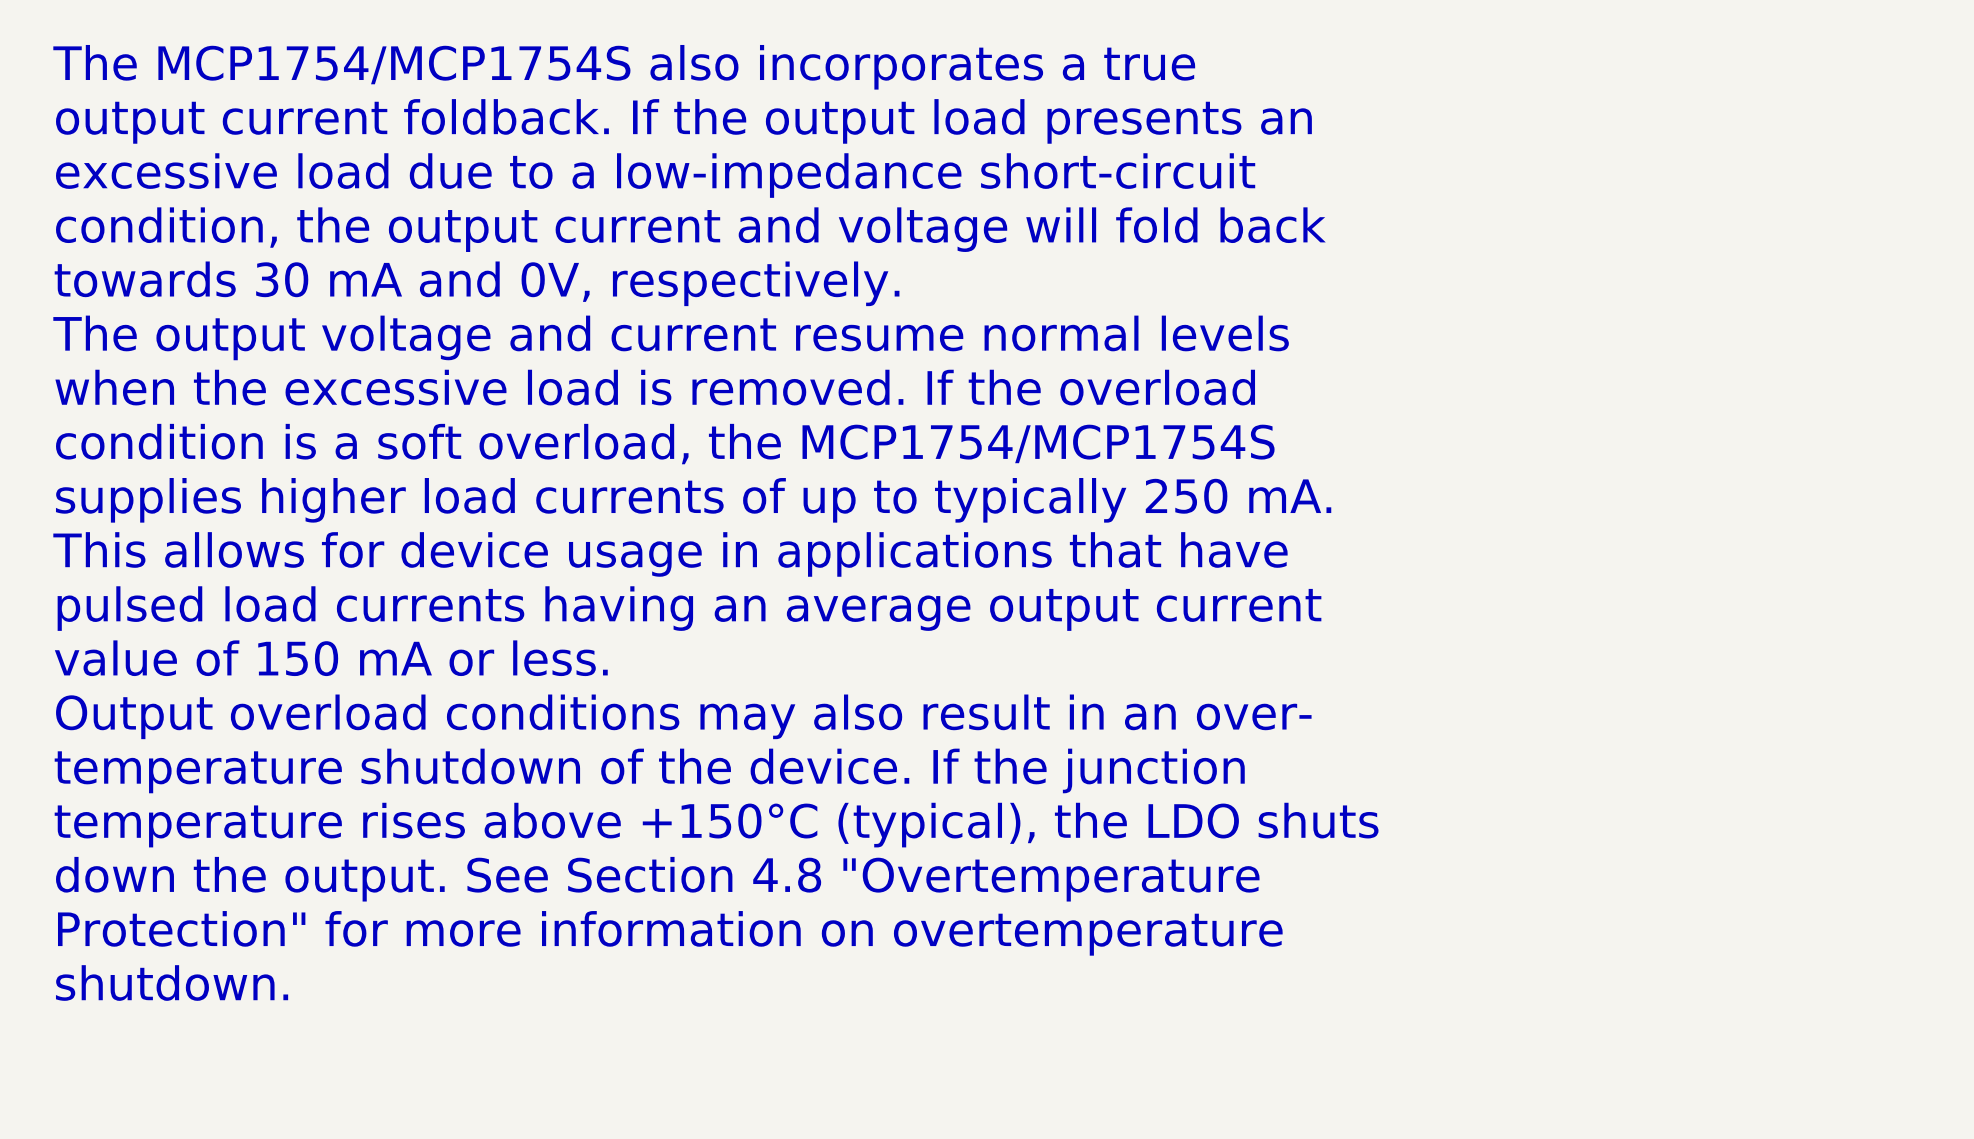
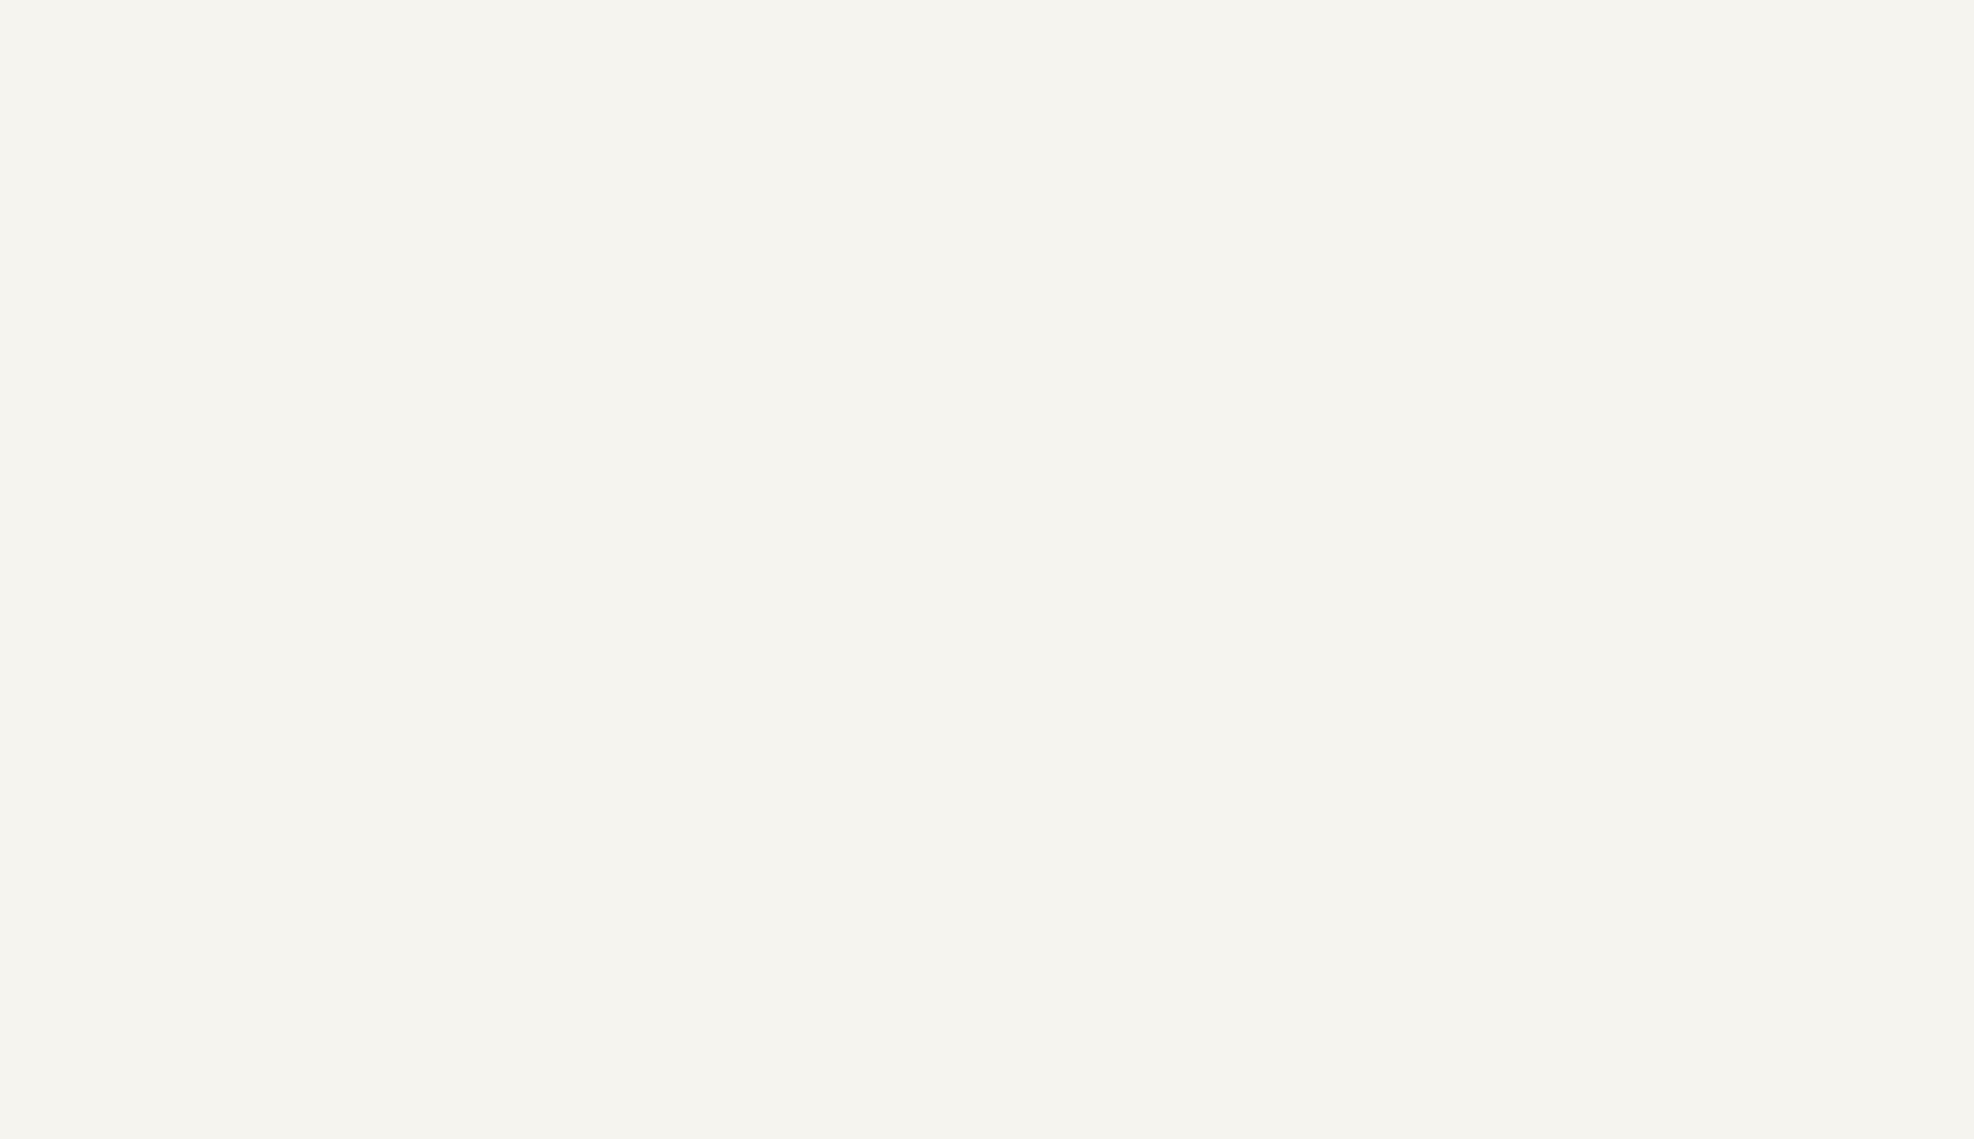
text: The MCP1754/MCP1754S also incorporates a true (624, 67) -> none
text: output current foldback. If the output load presents an (683, 121) -> none
text: excessive load due to a low-impedance short-circuit (655, 175) -> none
text: condition, the output current and voltage will fold back (690, 229) -> none
text: towards 30 mA and 0V, respectively. (477, 283) -> none
text: The output voltage and current resume normal levels (671, 337) -> none
text: when the excessive load is removed. If the overload (655, 387) -> none
text: condition is a soft overload, the MCP1754/MCP1754S (665, 444) -> none
text: supplies higher load currents of up to typically 250 mA. (693, 500) -> none
text: This allows for device usage in applications that have (670, 554) -> none
text: pulsed load currents having an average output current (689, 608) -> none
text: value of 150 mA or less. (331, 658) -> none
text: Output overload conditions may also result in an over- (683, 716) -> none
text: temperature shutdown of the device. If the junction (649, 770) -> none
text: temperature rises above +150°C (typical), the LDO shuts (716, 825) -> none
text: down the output. See Section 4.8 "Overtemperature (657, 879) -> none
text: Protection" for more information on overtemperature (670, 933) -> none
text: shutdown. (172, 983) -> none

